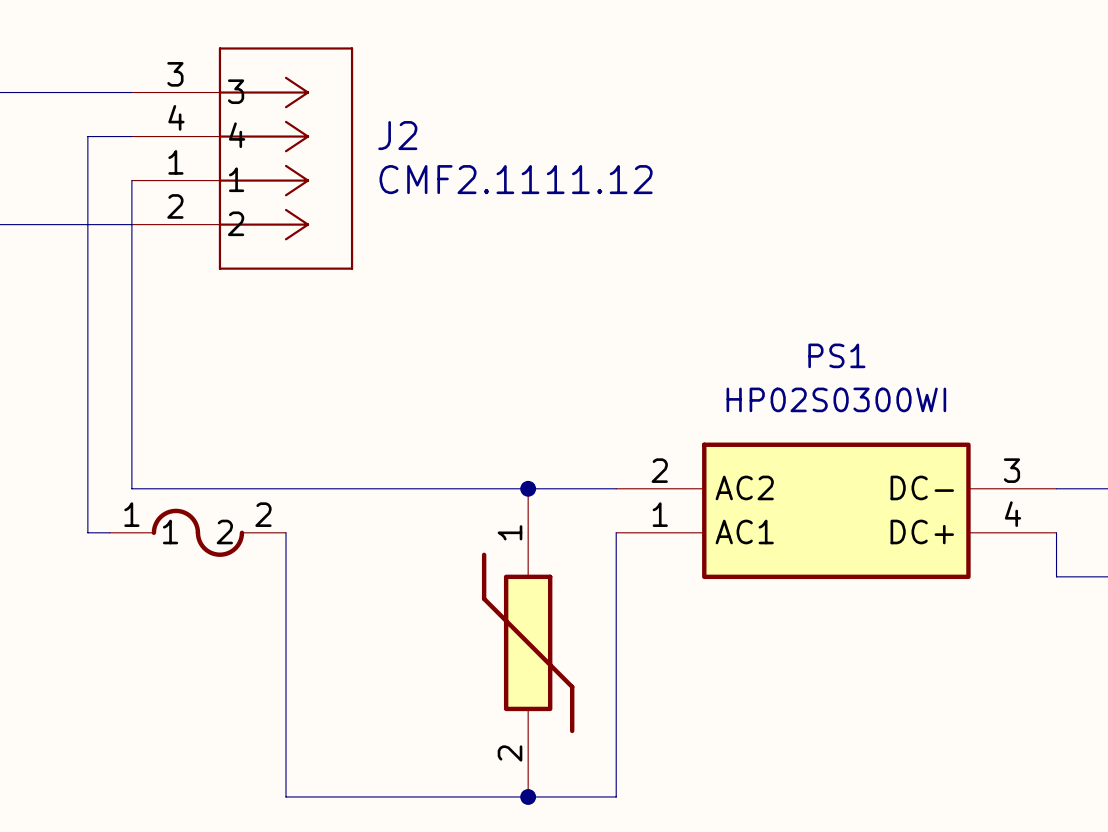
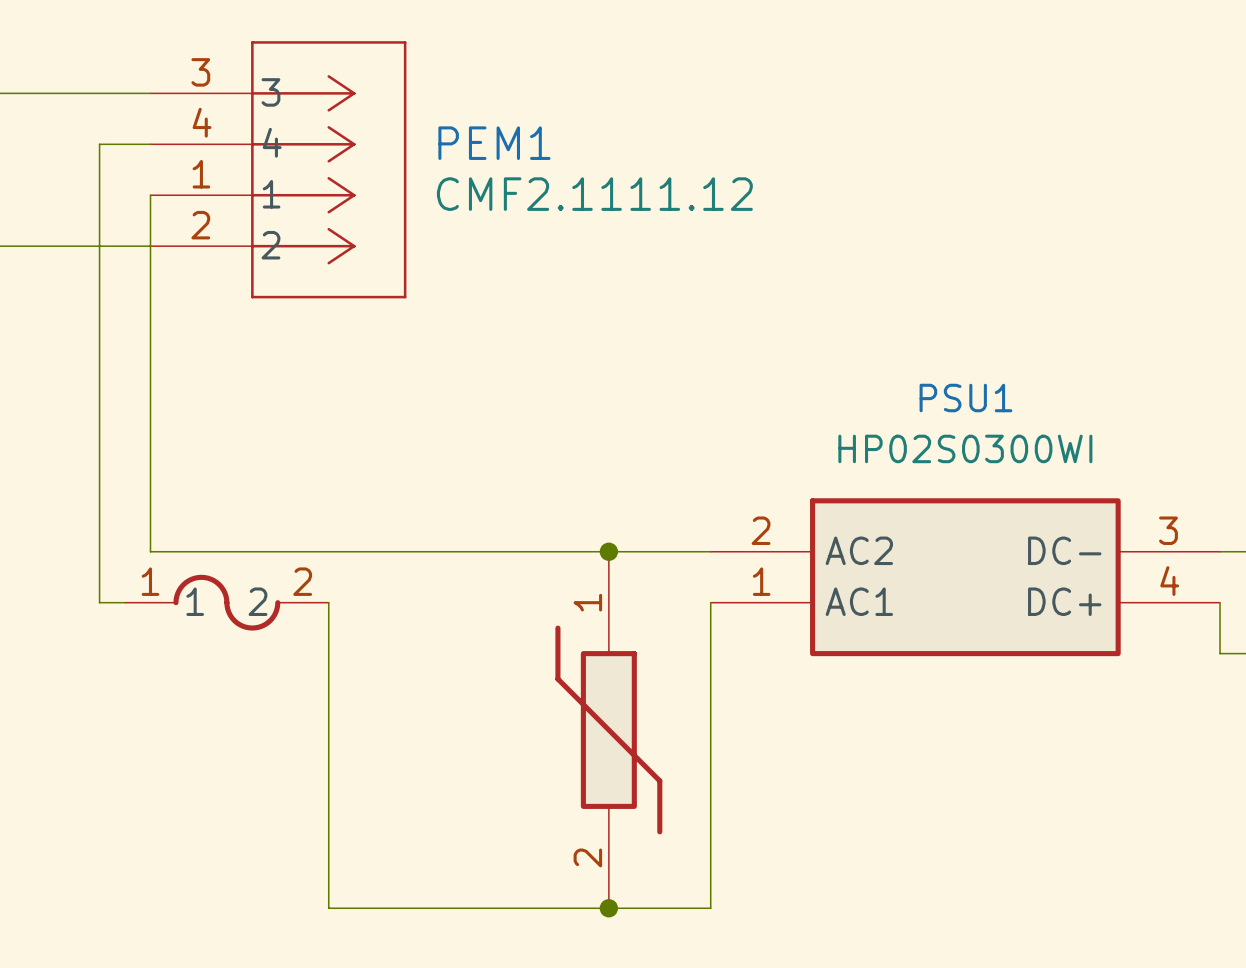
J2 name: J2 (397, 135) -> PEM1 (494, 143)
PS1 name: PS1 (836, 355) -> PSU1 (965, 398)

